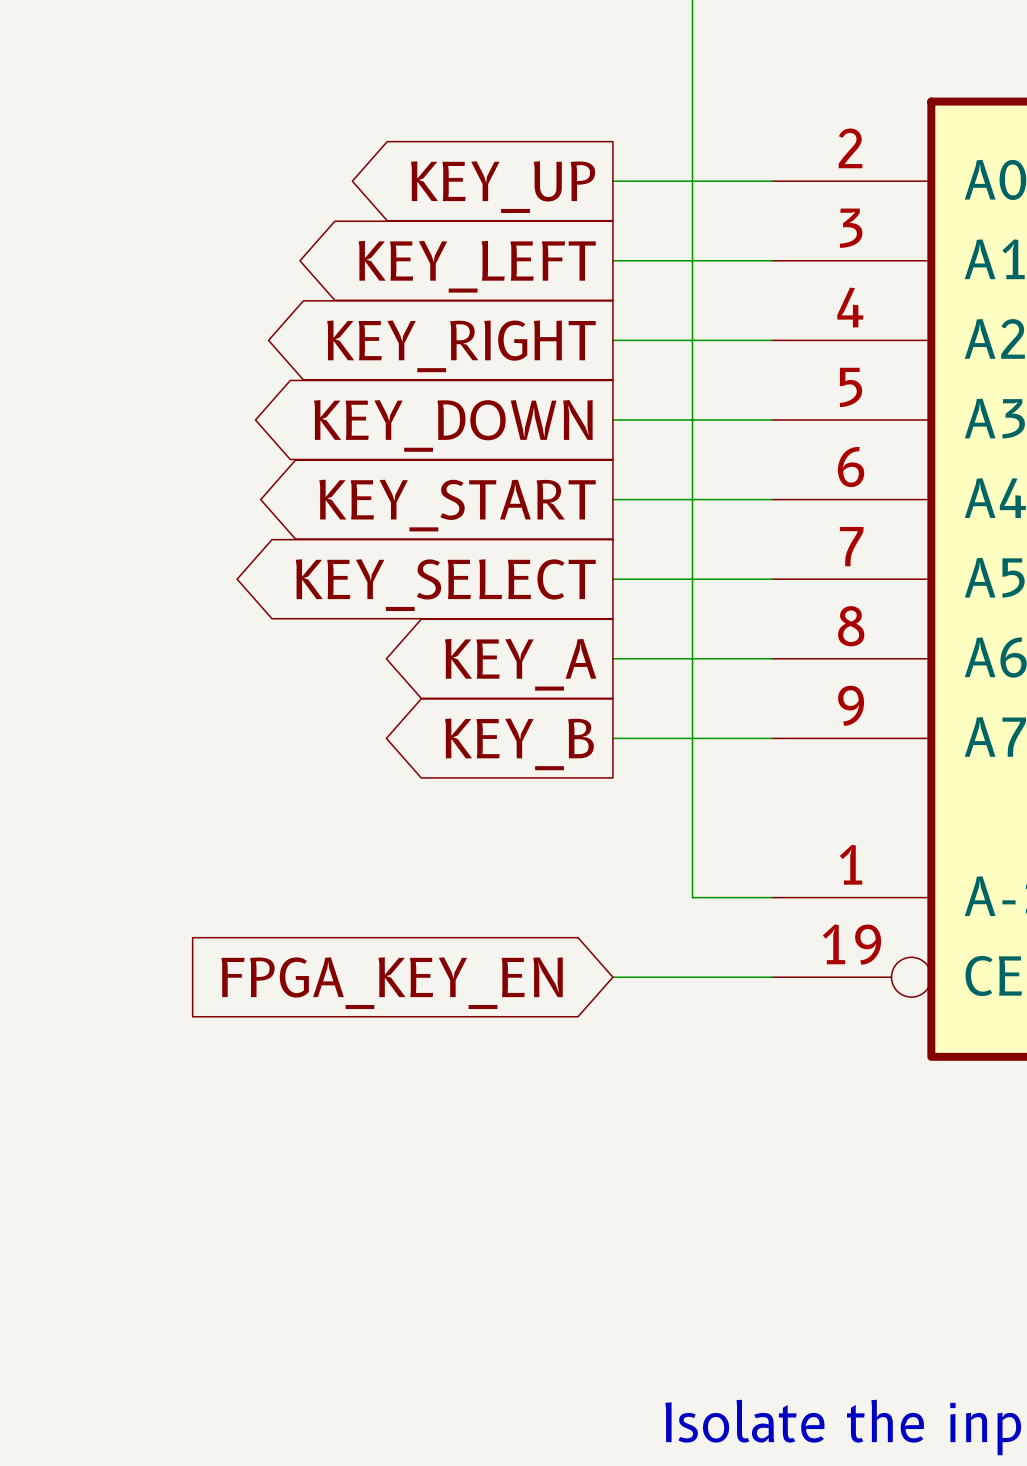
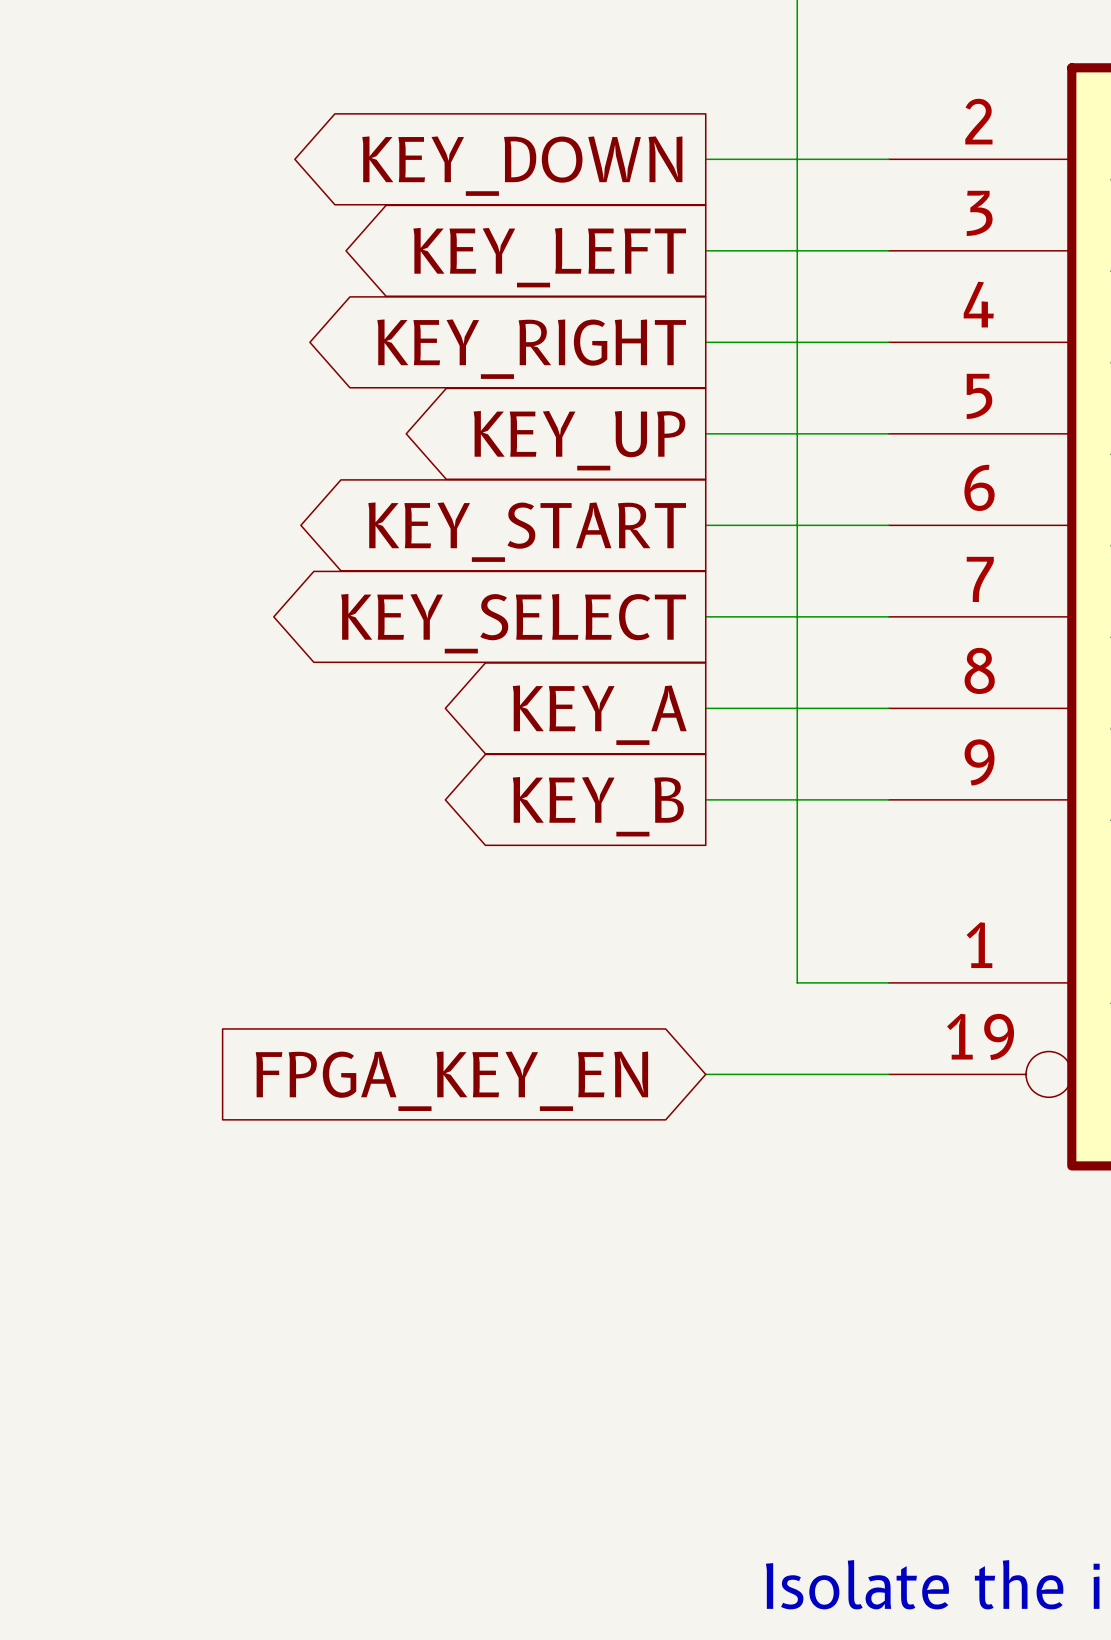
global label: KEY_UP (503, 187) -> KEY_DOWN (522, 166)
global label: KEY_DOWN (453, 425) -> KEY_UP (579, 440)

